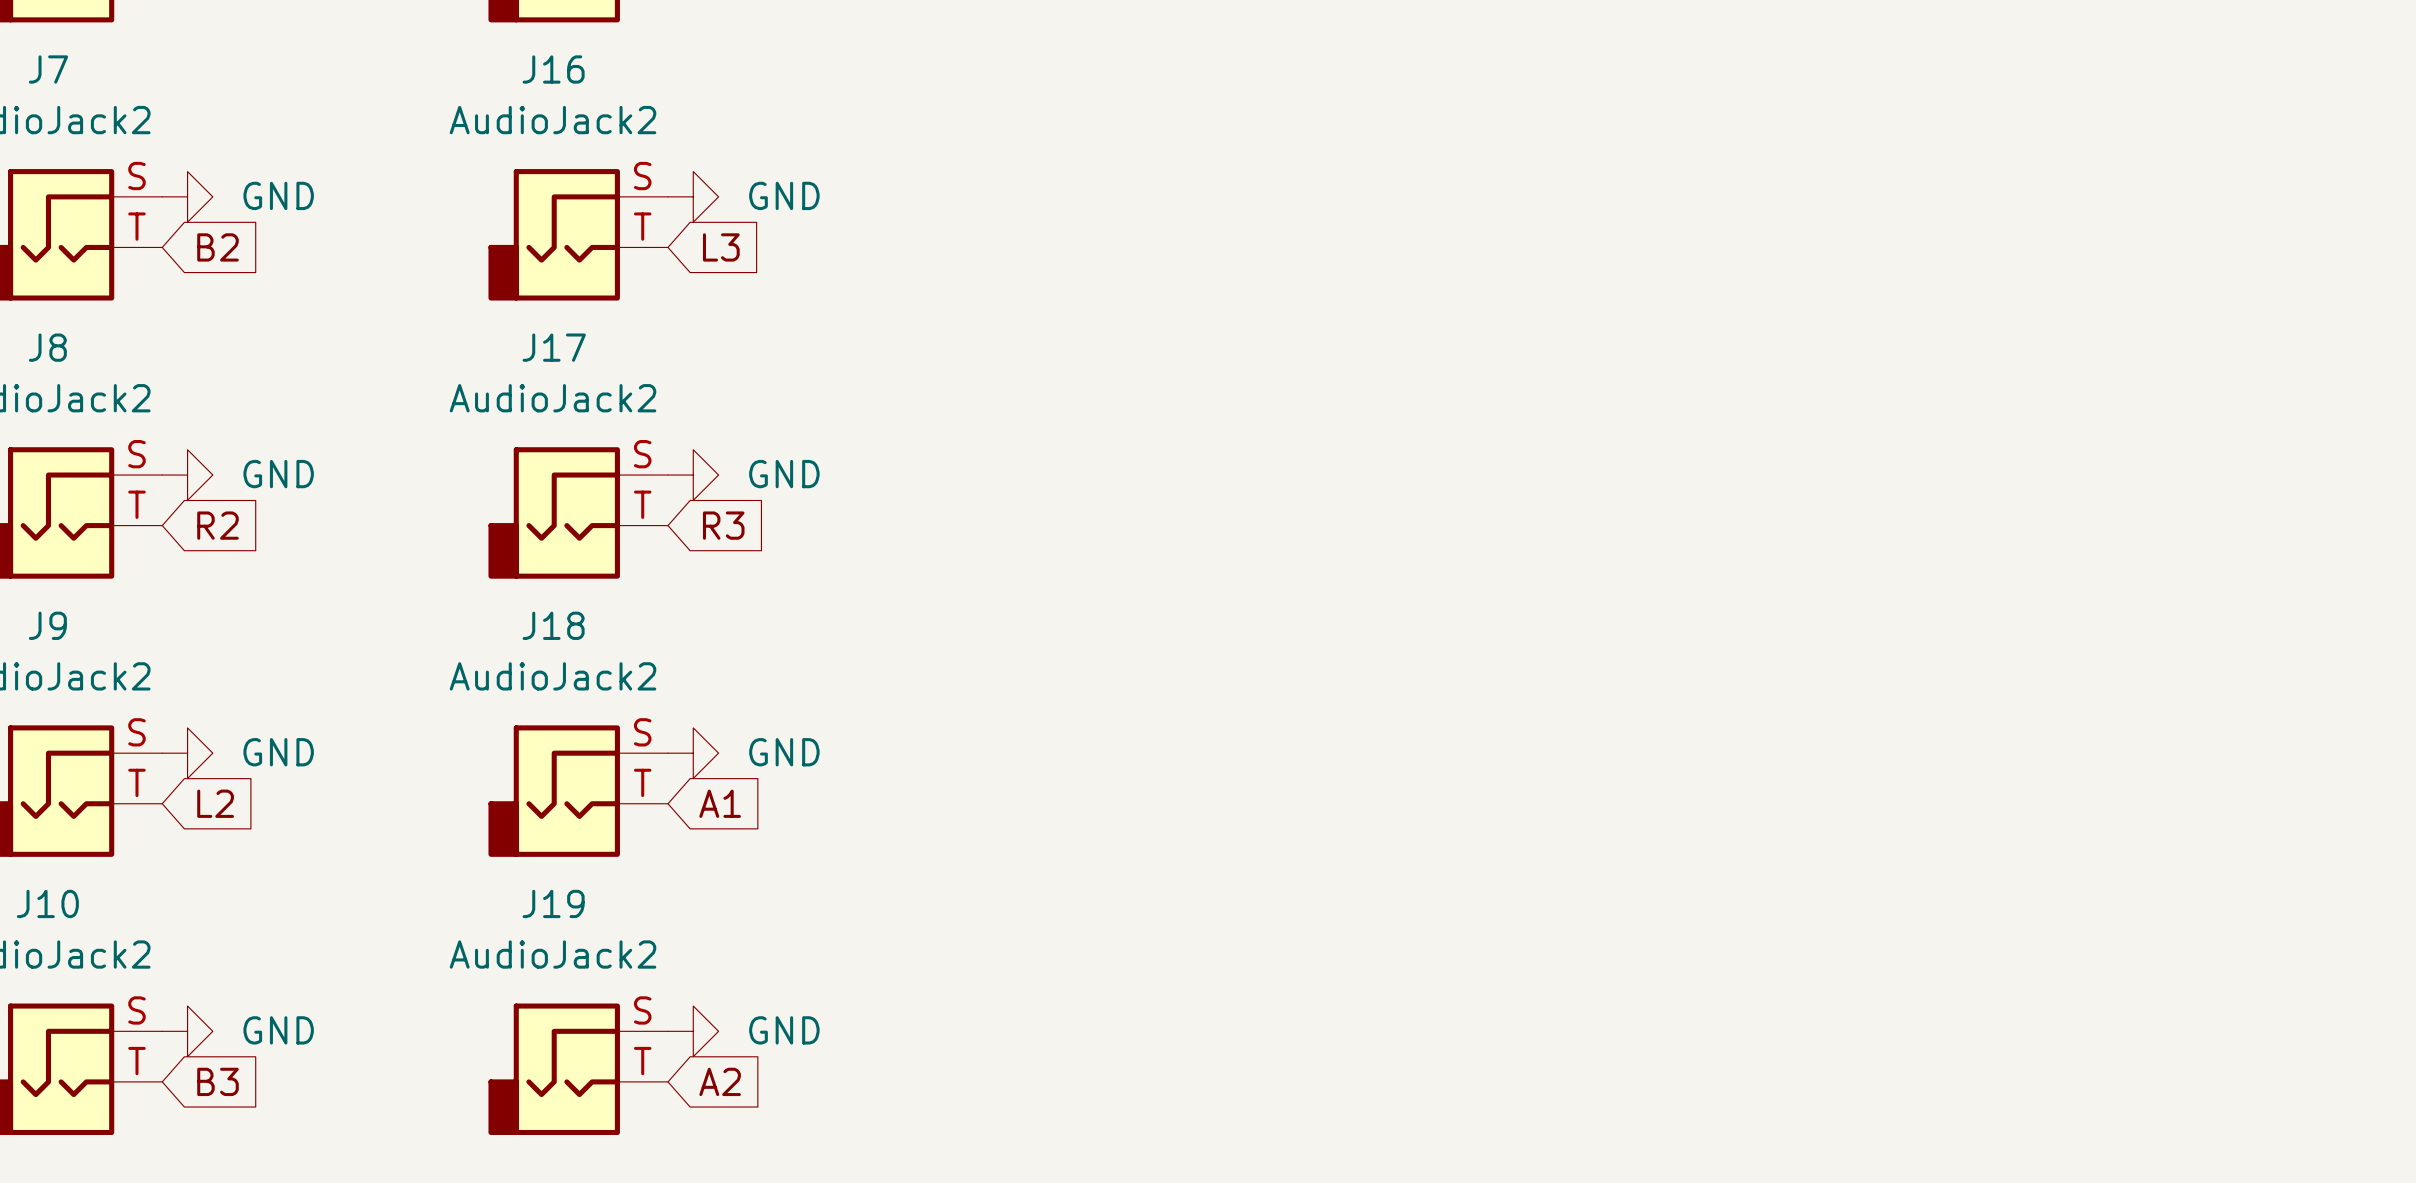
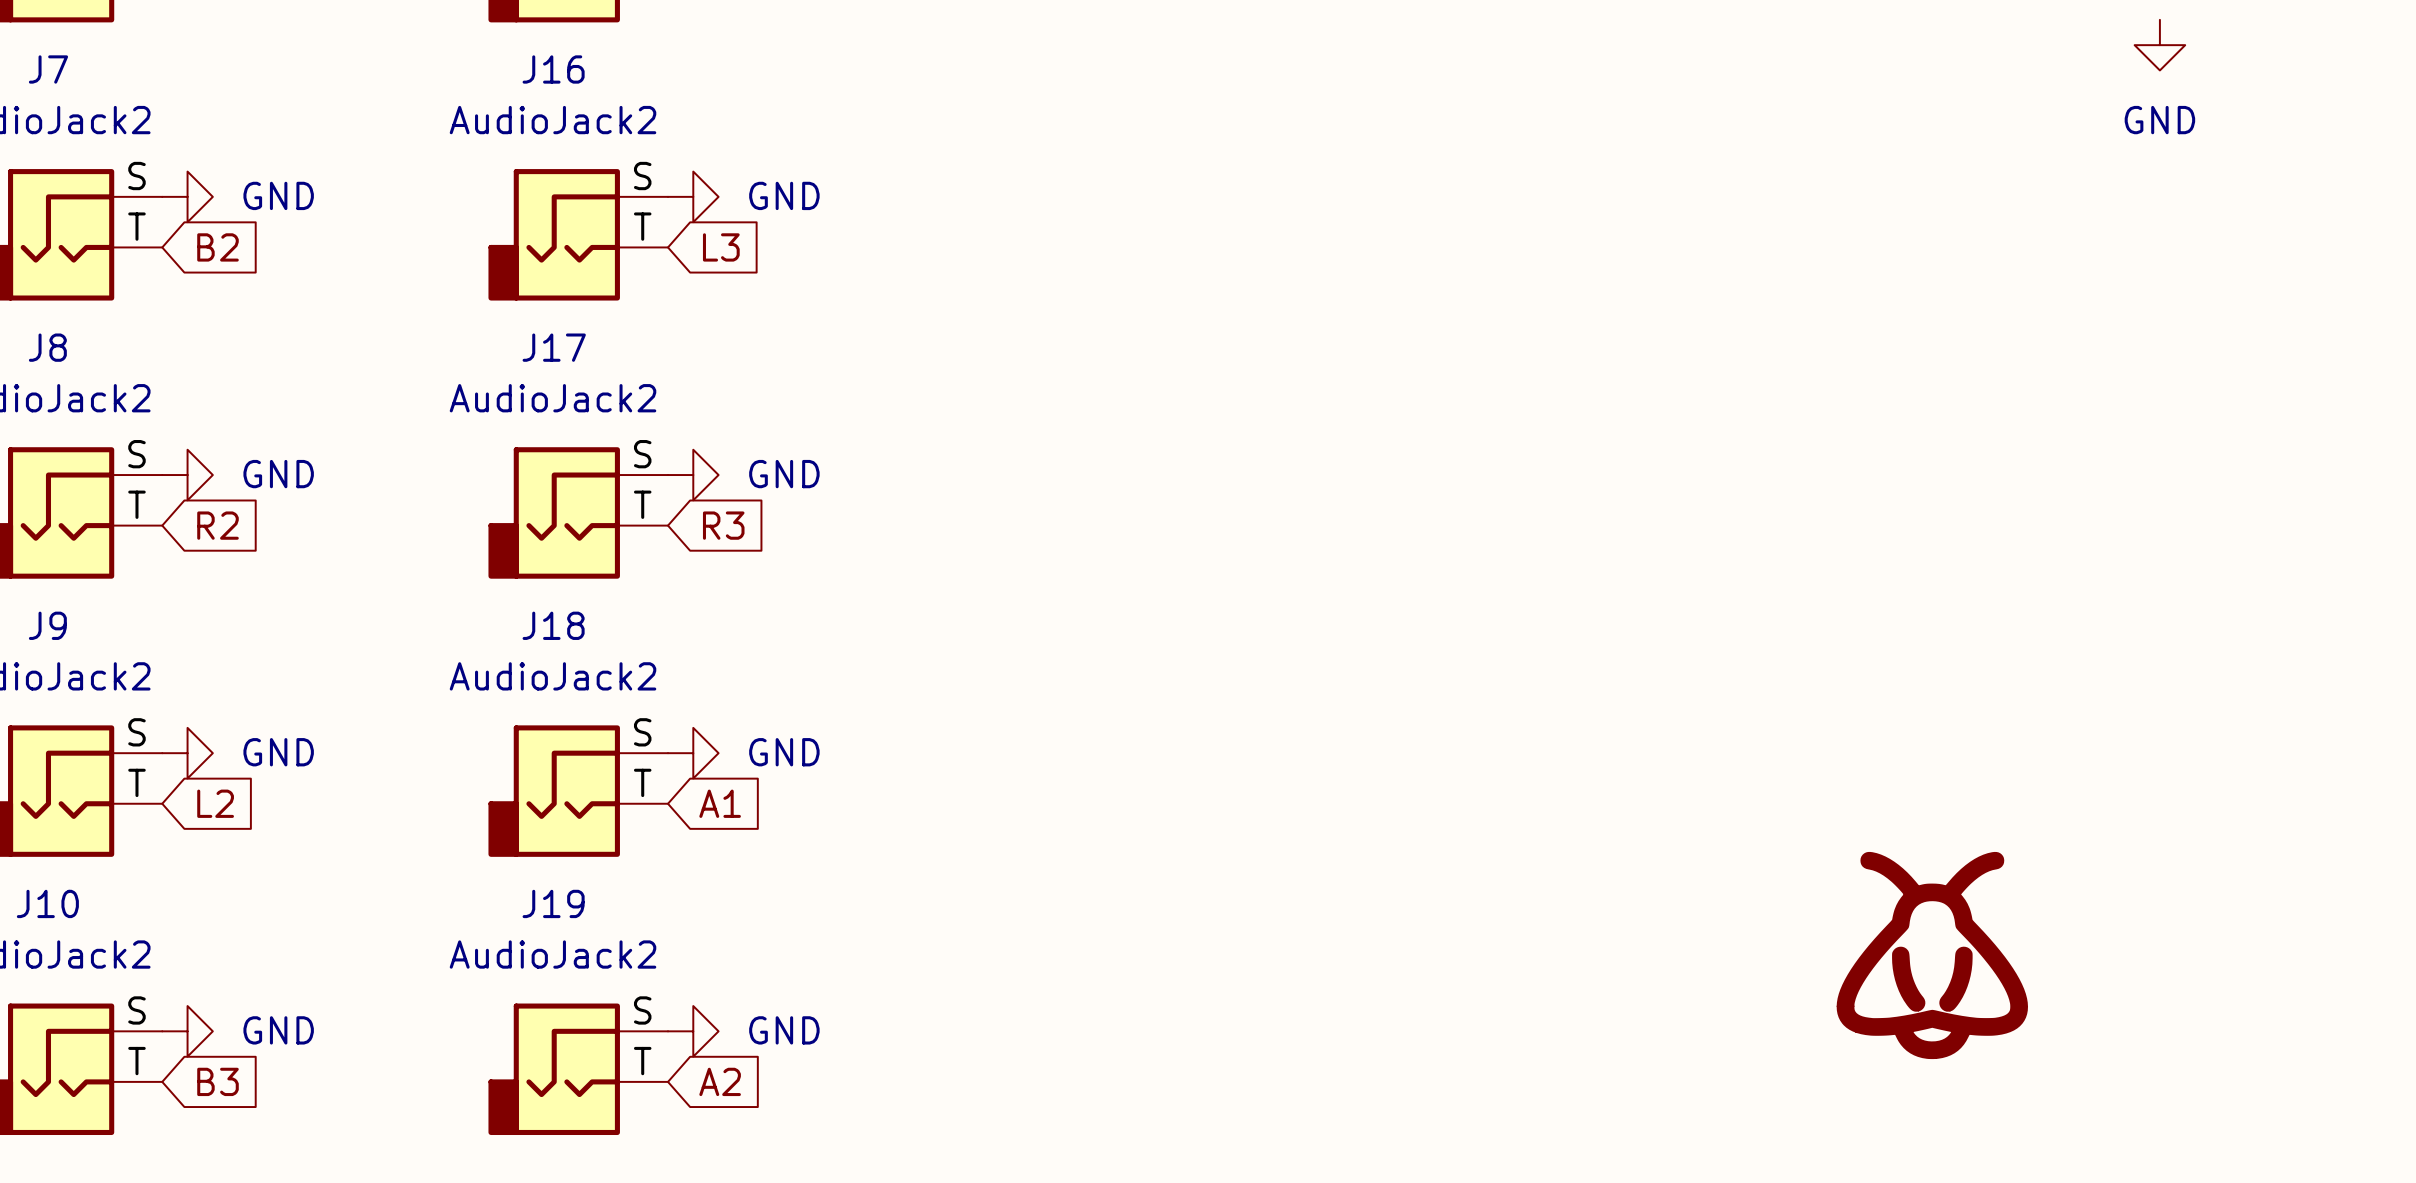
power symbol: none -> GND (2159, 45)
power symbol: none -> (1932, 955)

